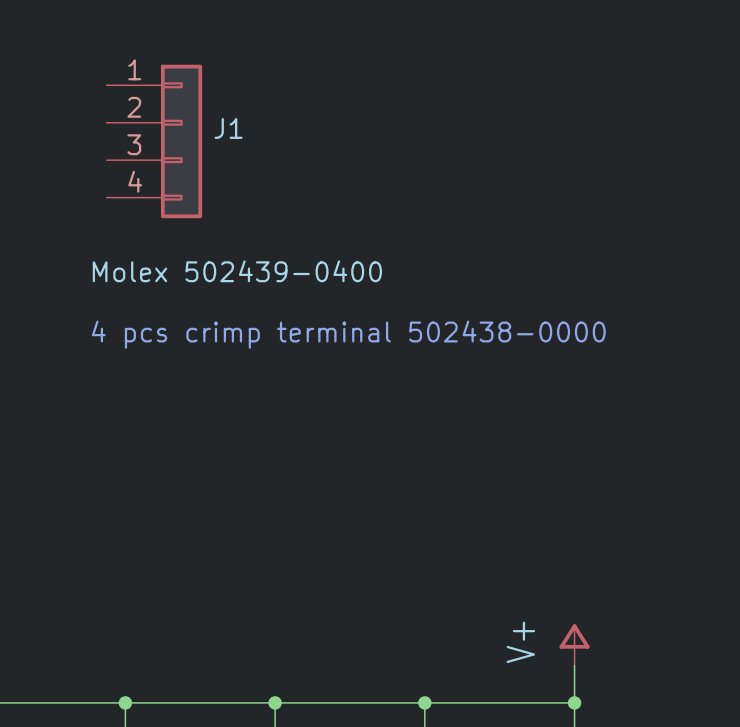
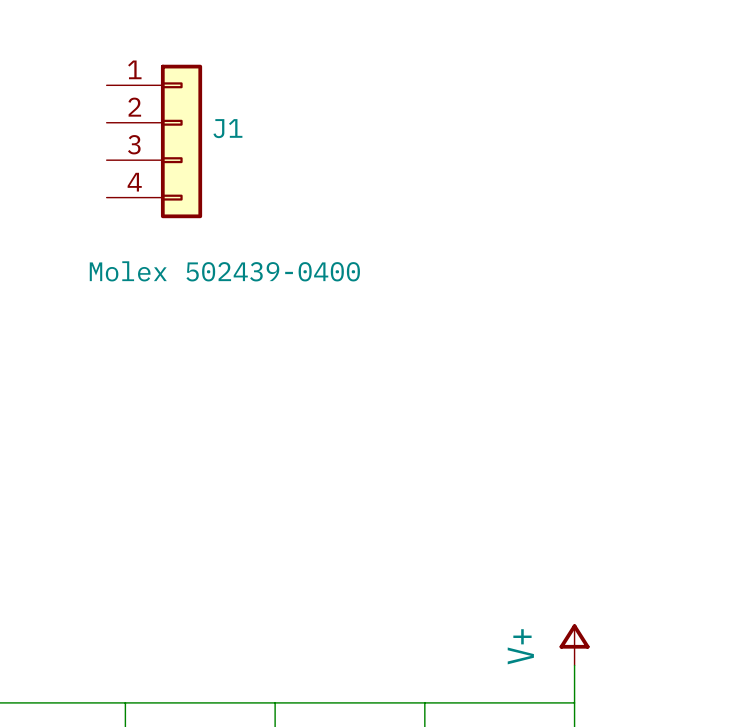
text: 4 pcs crimp terminal 502438-0000 (348, 334) -> none
junction: (125, 702) -> none
junction: (275, 702) -> none
junction: (424, 702) -> none
junction: (574, 702) -> none

